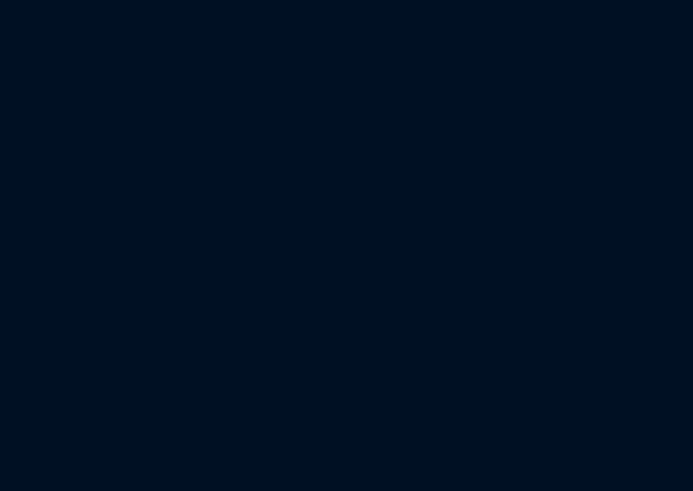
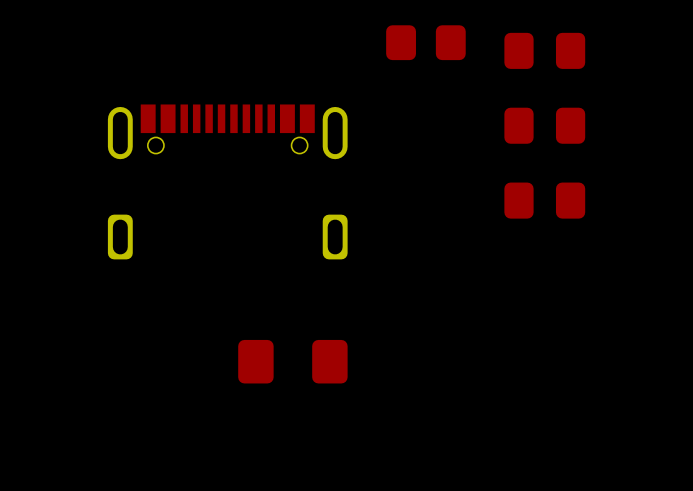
part: none -> (425, 42)
part: none -> (544, 50)
part: none -> (544, 125)
part: none -> (227, 181)
part: none -> (544, 200)
part: none -> (292, 361)

